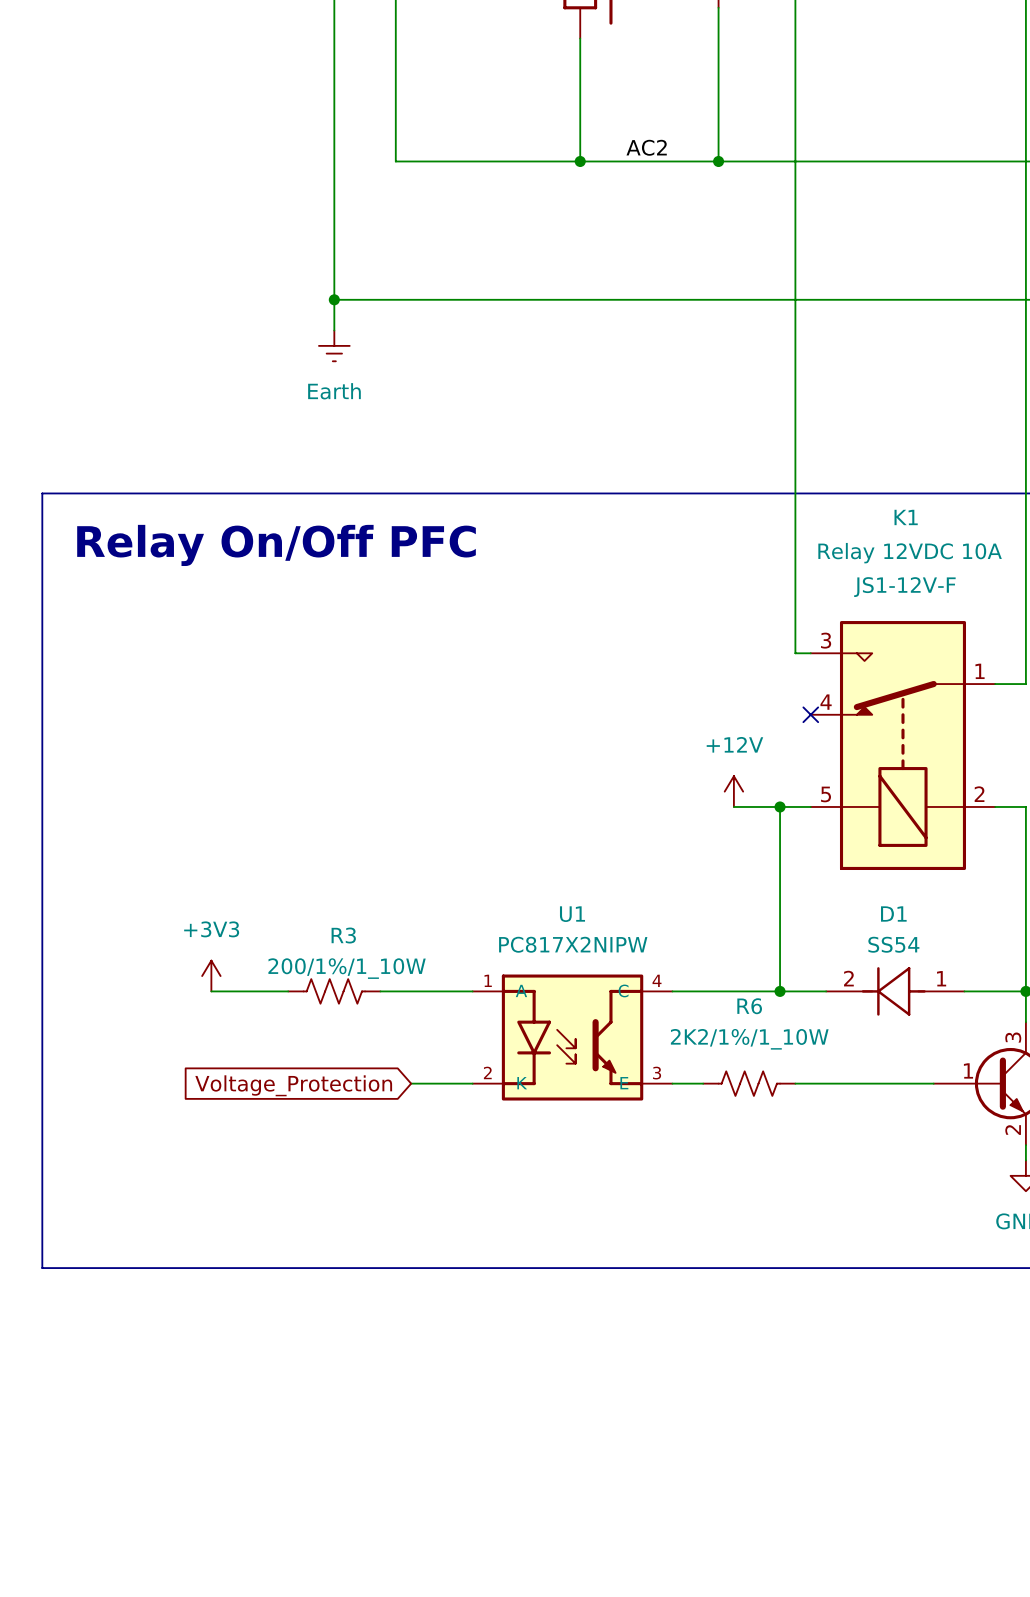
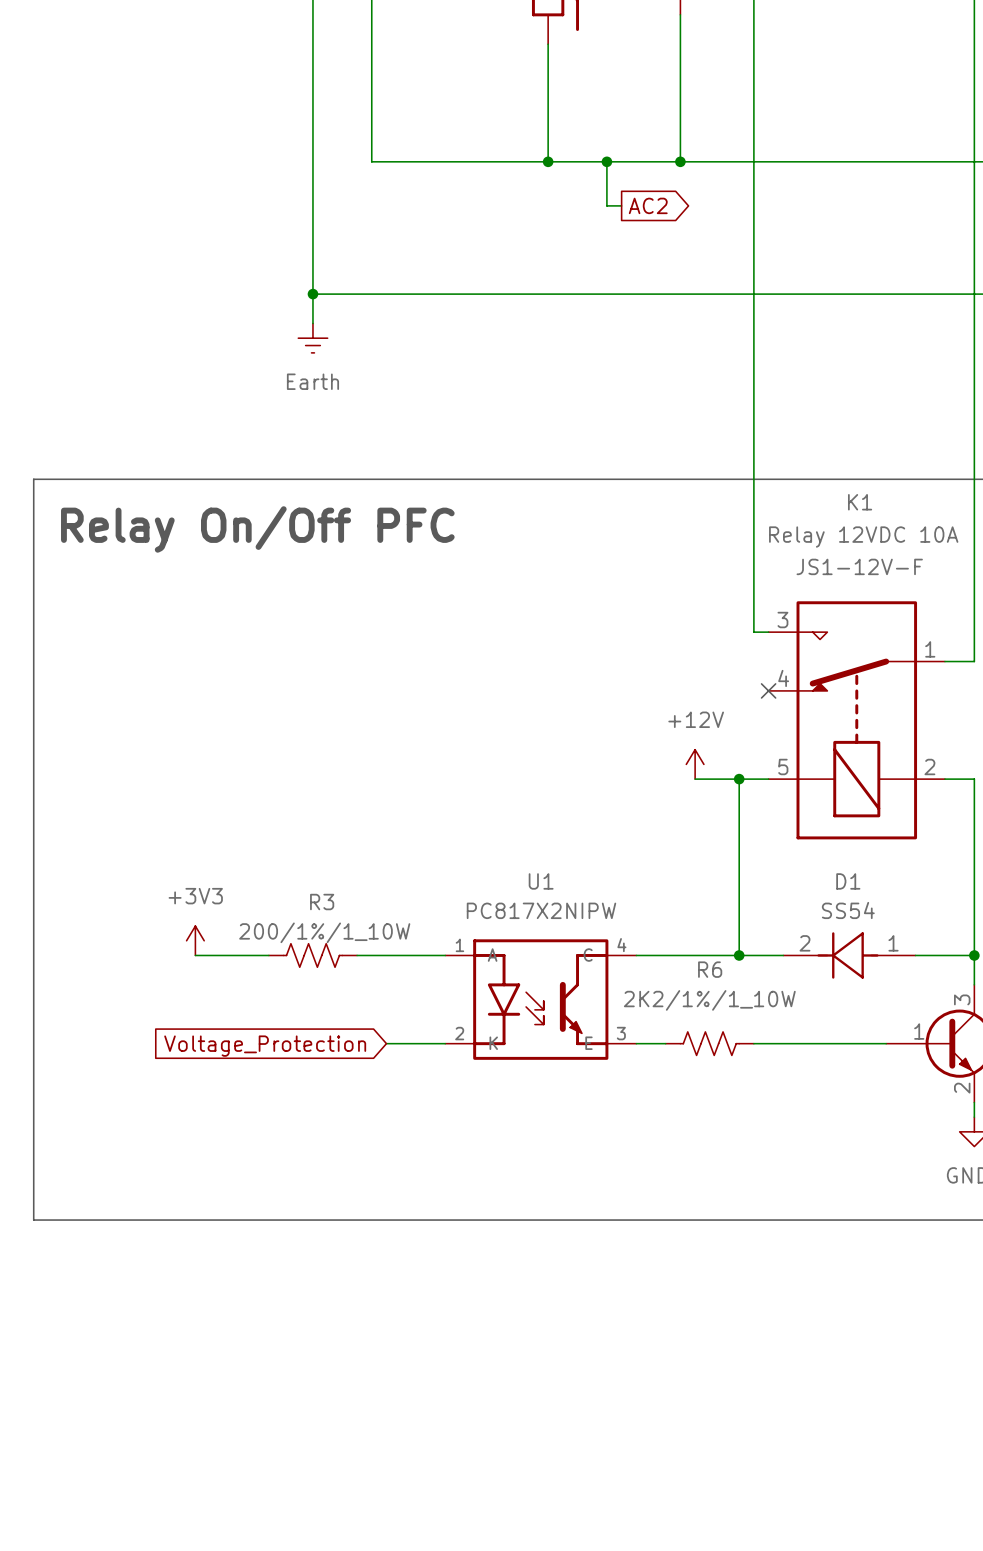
label: AC2 (646, 147) -> none
wire: none -> (606, 161) (606, 205) (621, 205)
junction: none -> (606, 161)
global label: none -> AC2 (648, 205)

